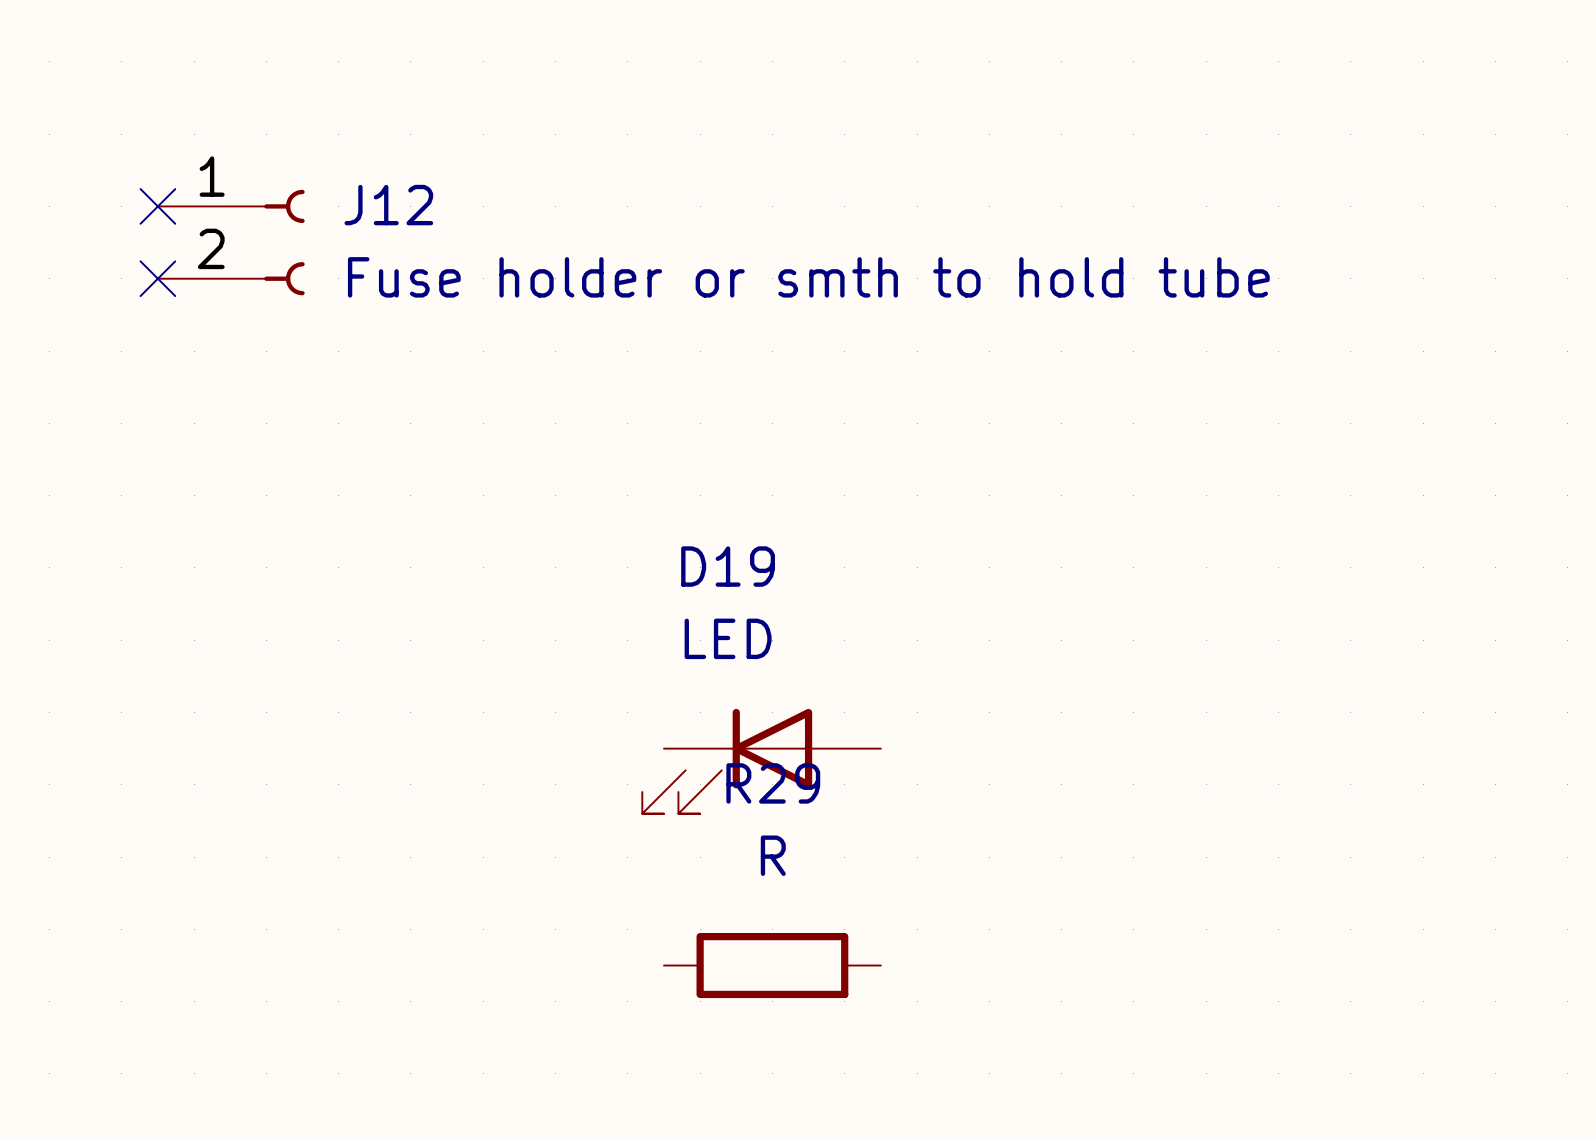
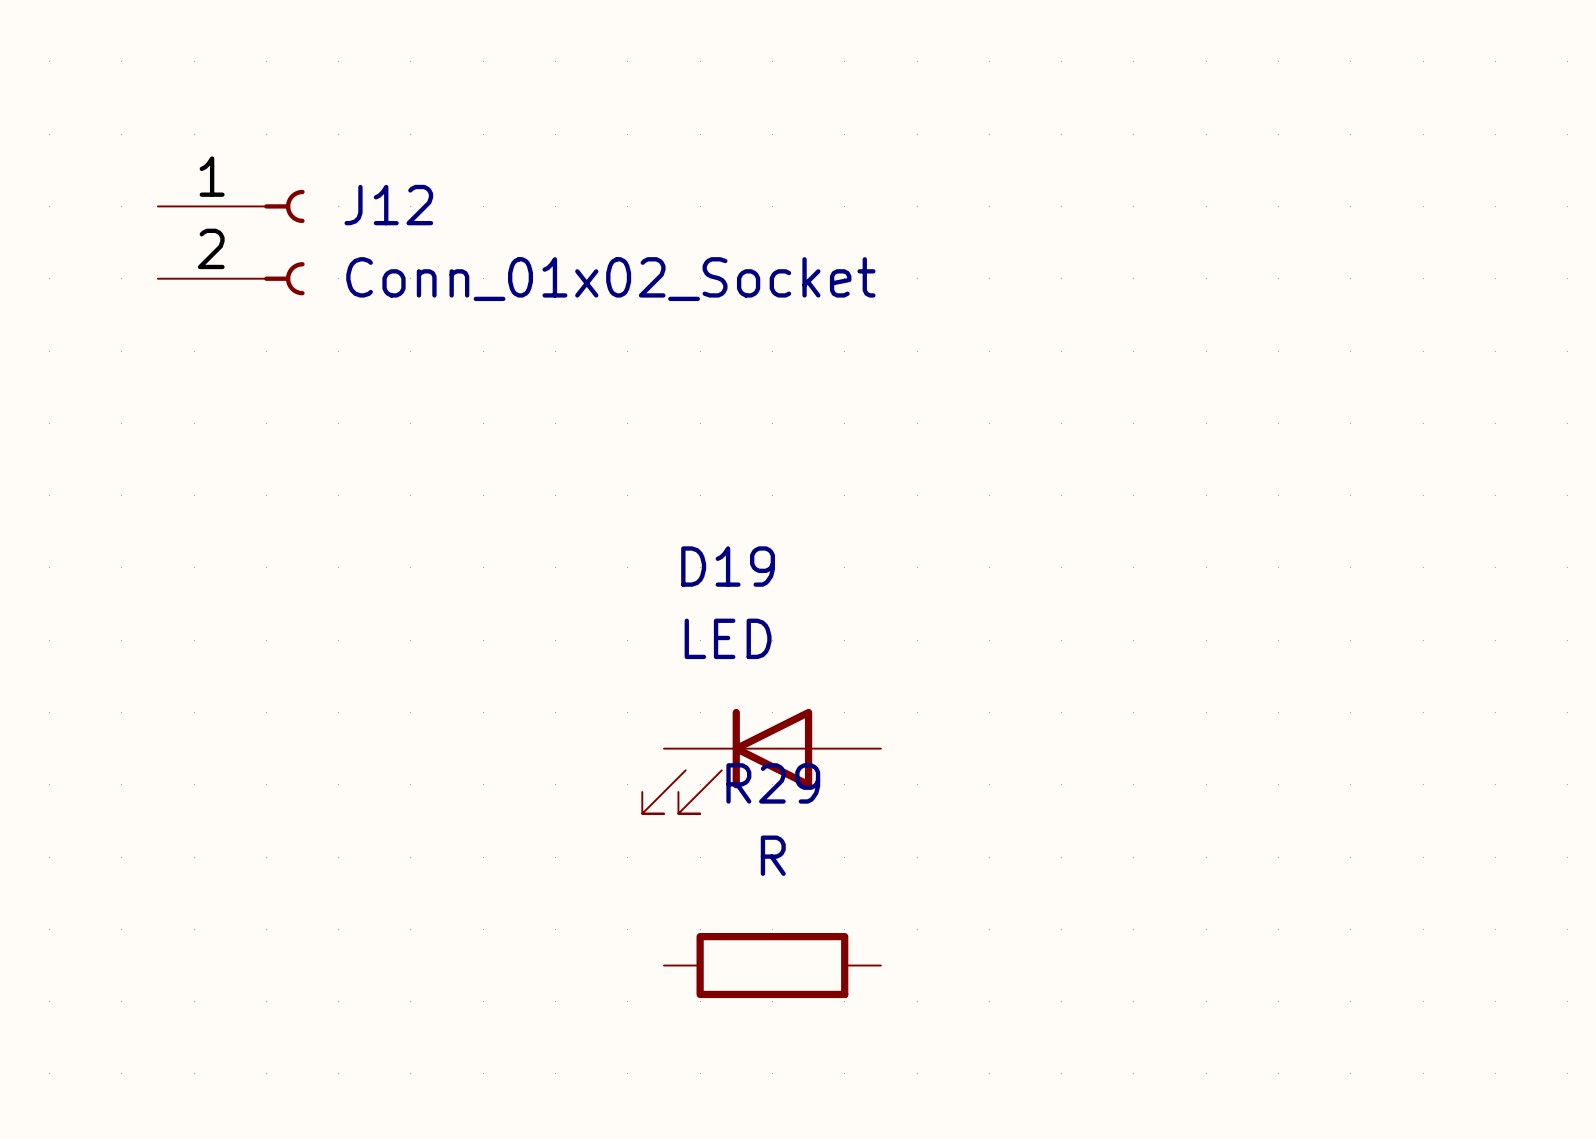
no-connect mark: (157, 206) -> none
J12 value: Fuse holder or smth to hold tube (808, 277) -> Conn_01x02_Socket (610, 279)
no-connect mark: (157, 278) -> none

